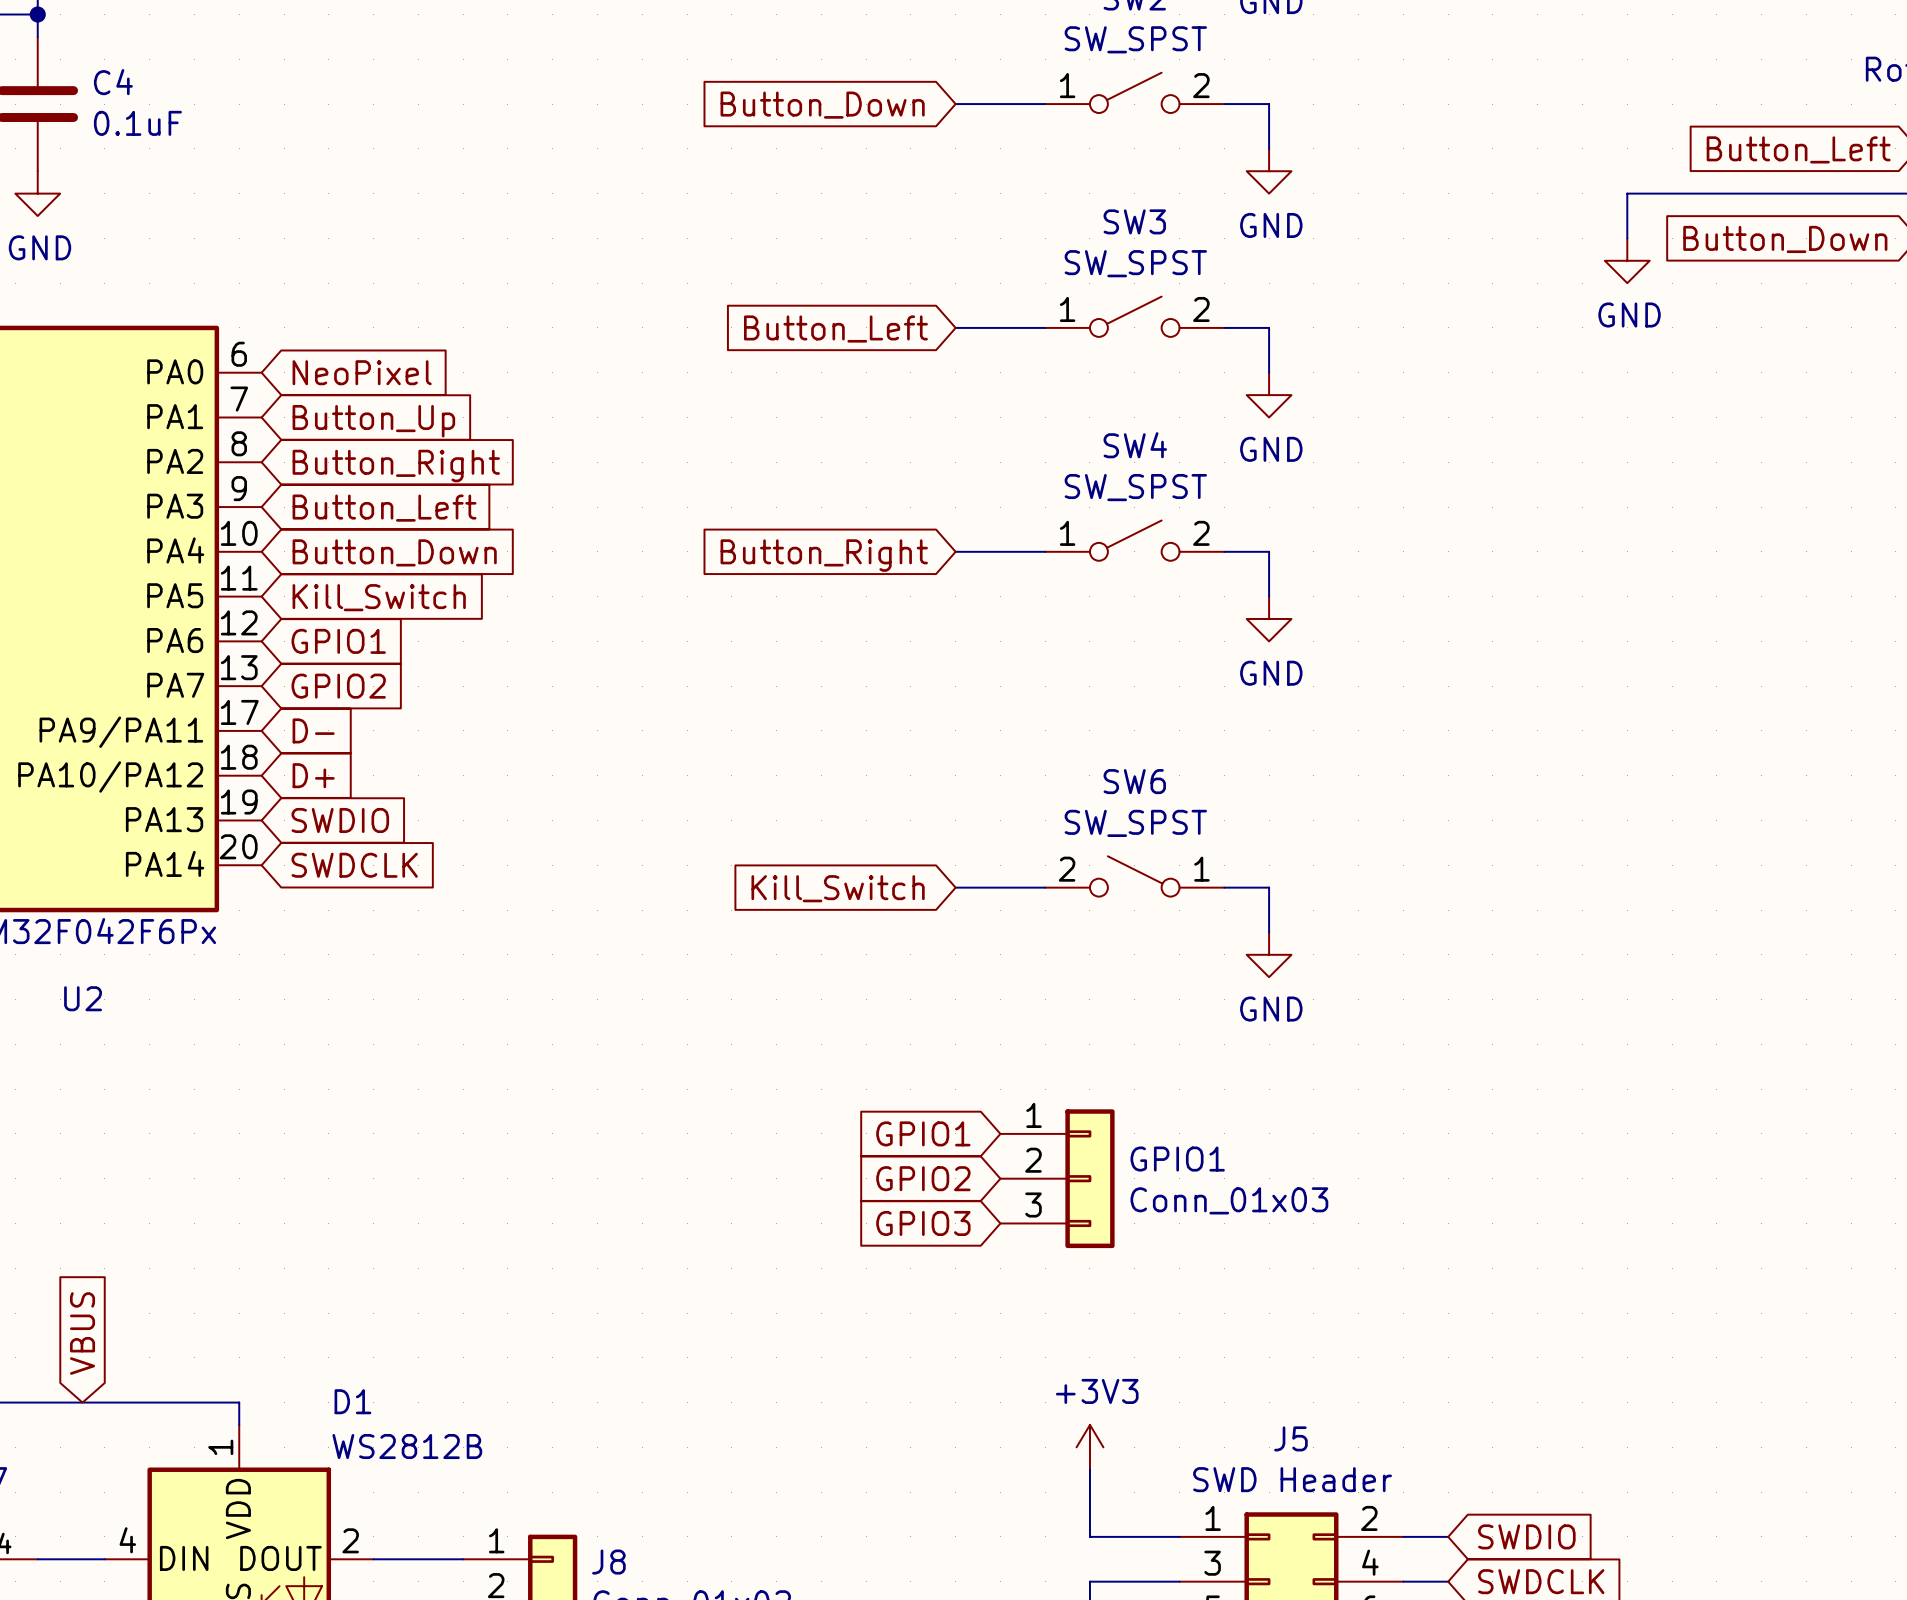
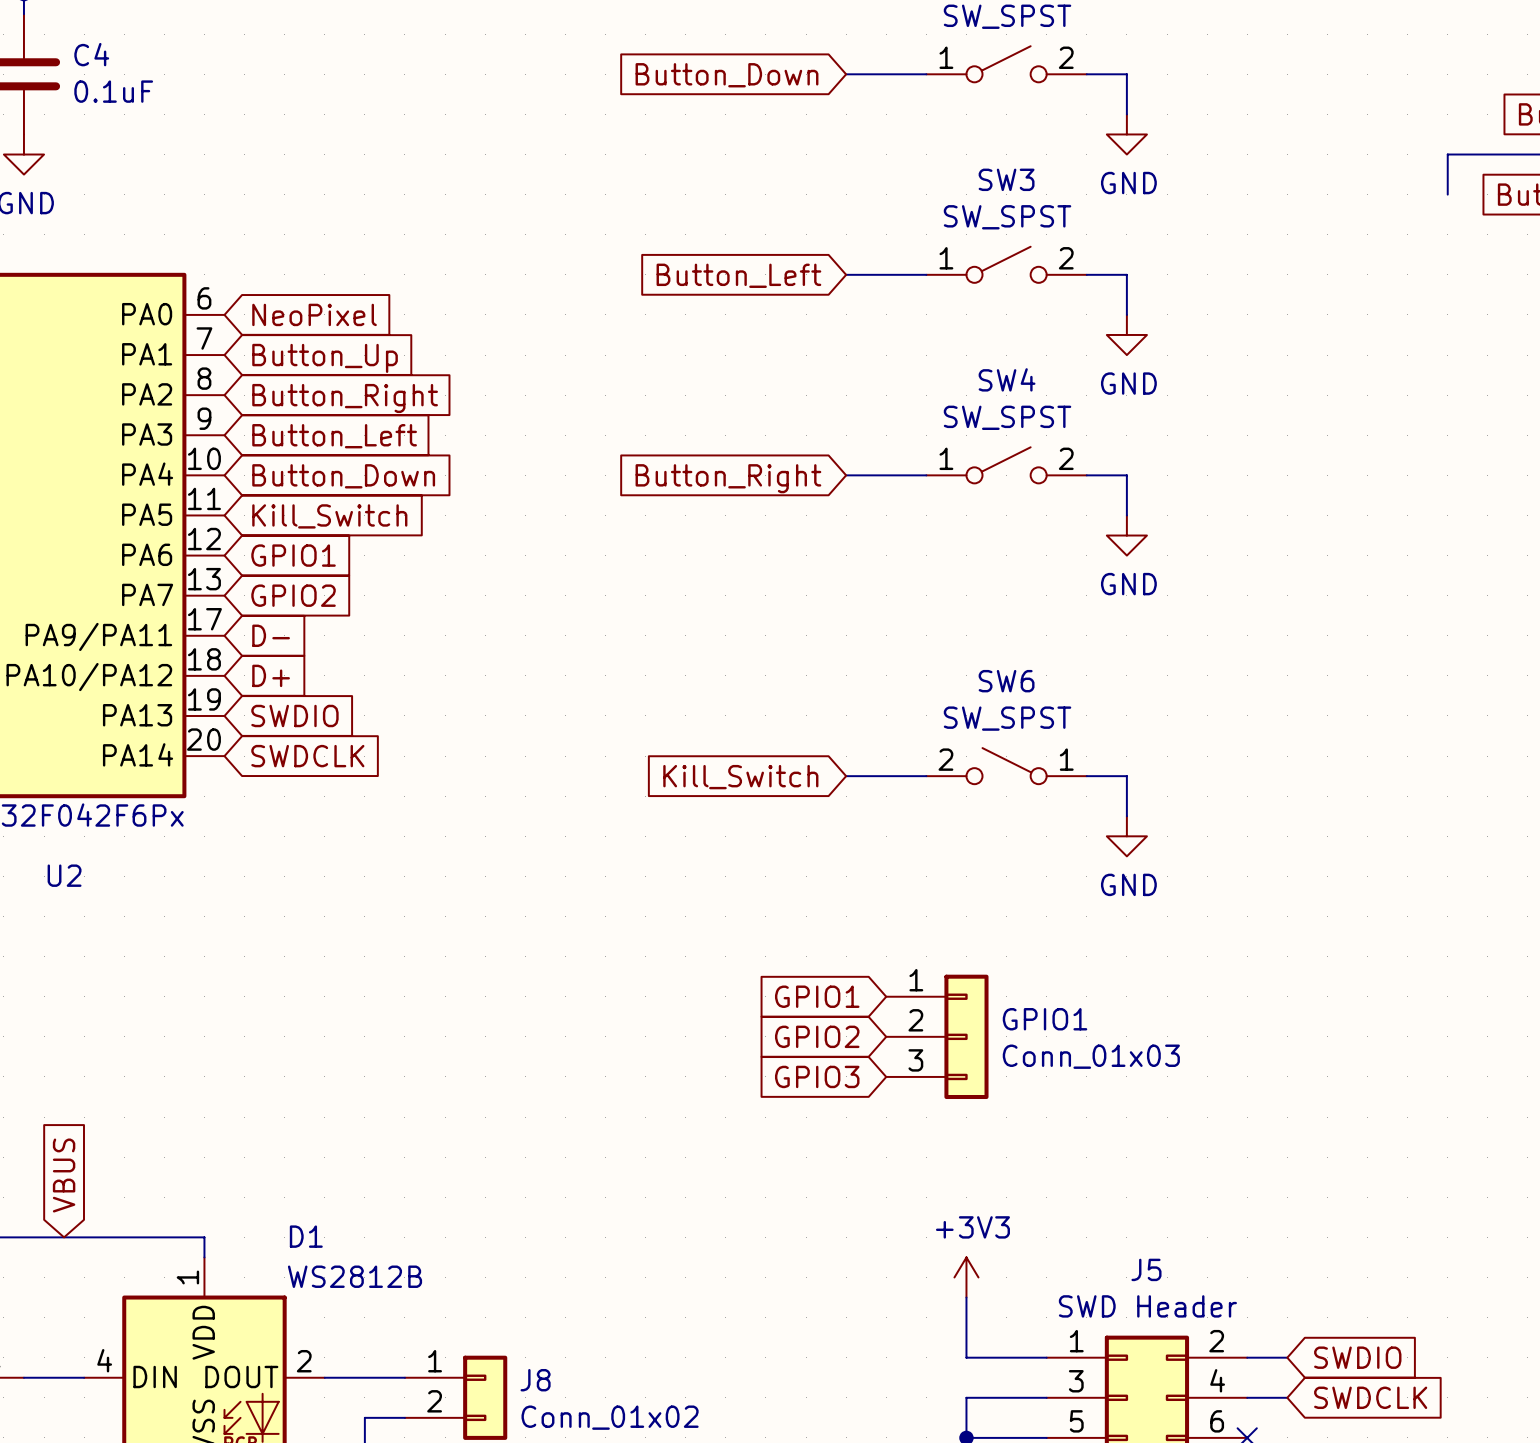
power symbol: GND (1627, 260) -> none

